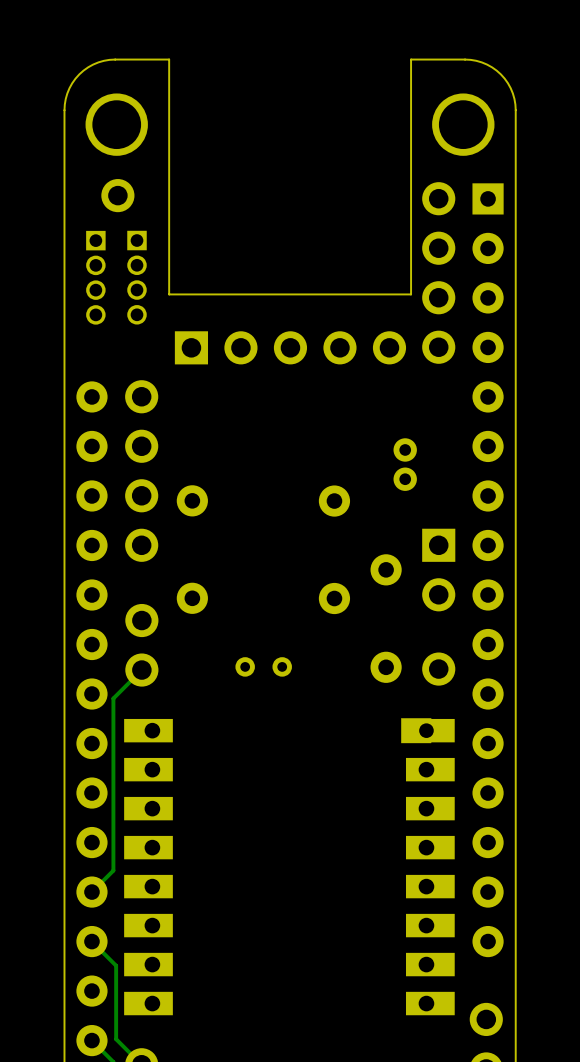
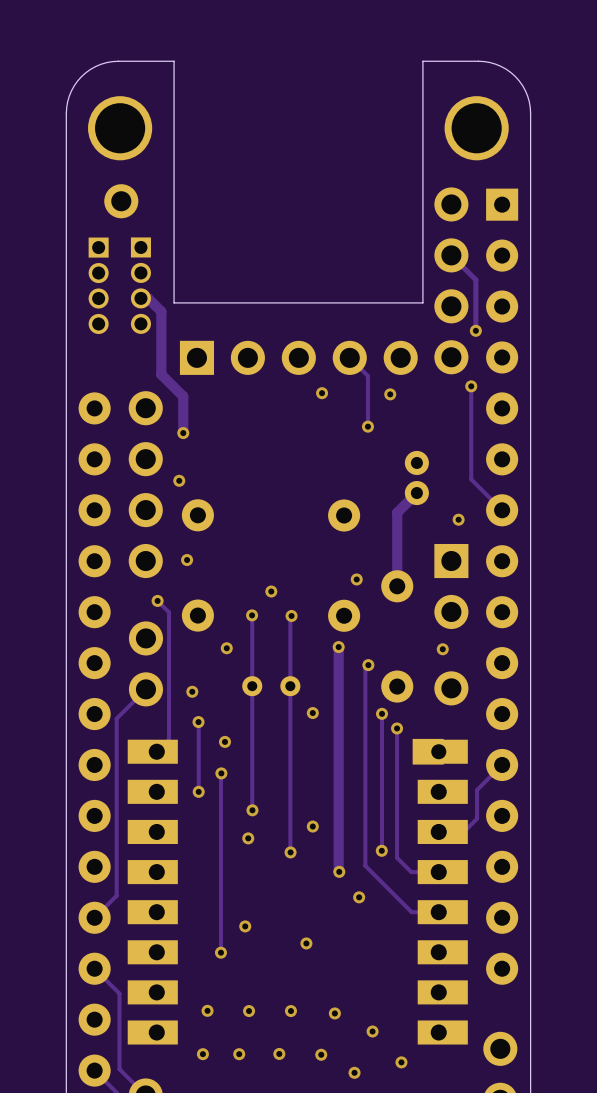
track: none -> (451, 255) (475, 279) (475, 330)
track: none -> (140, 298) (148, 298) (161, 311) (161, 374) (183, 396) (183, 433)
via: none -> (475, 330)
track: none -> (349, 357) (367, 376) (367, 426)
track: none -> (471, 386) (471, 479) (502, 510)
via: none -> (471, 386)
via: none -> (322, 393)
via: none -> (390, 394)
via: none -> (367, 426)
via: none -> (183, 433)
via: none -> (179, 480)
track: none -> (416, 493) (397, 512) (397, 586)
via: none -> (458, 519)
via: none -> (187, 560)
via: none -> (356, 579)
via: none -> (271, 591)
track: none -> (157, 600) (169, 612) (169, 739) (156, 751)
via: none -> (157, 600)
via: none -> (252, 615)
track: none -> (252, 615) (252, 810)
track: none -> (291, 615) (290, 852)
via: none -> (291, 615)
track: none -> (338, 647) (339, 871)
via: none -> (338, 647)
via: none -> (226, 648)
via: none -> (442, 649)
track: none -> (368, 665) (365, 668) (365, 865) (411, 912) (438, 912)
via: none -> (368, 665)
via: none -> (192, 691)
via: none -> (312, 713)
track: none -> (382, 713) (382, 850)
via: none -> (382, 713)
via: none -> (198, 722)
track: none -> (198, 722) (198, 791)
track: none -> (397, 728) (397, 857) (411, 872) (438, 872)
via: none -> (397, 728)
via: none -> (224, 741)
track: none -> (502, 764) (477, 790) (477, 818) (463, 831) (438, 831)
track: none -> (221, 773) (220, 952)
via: none -> (221, 773)
via: none -> (198, 791)
via: none -> (252, 810)
via: none -> (312, 826)
via: none -> (248, 838)
via: none -> (381, 850)
via: none -> (290, 852)
via: none -> (339, 871)
via: none -> (359, 897)
via: none -> (245, 926)
via: none -> (306, 943)
via: none -> (220, 952)
via: none -> (207, 1010)
via: none -> (249, 1011)
via: none -> (290, 1011)
via: none -> (334, 1013)
via: none -> (372, 1031)
via: none -> (202, 1054)
via: none -> (239, 1054)
via: none -> (279, 1053)
via: none -> (321, 1054)
via: none -> (401, 1062)
via: none -> (354, 1072)

